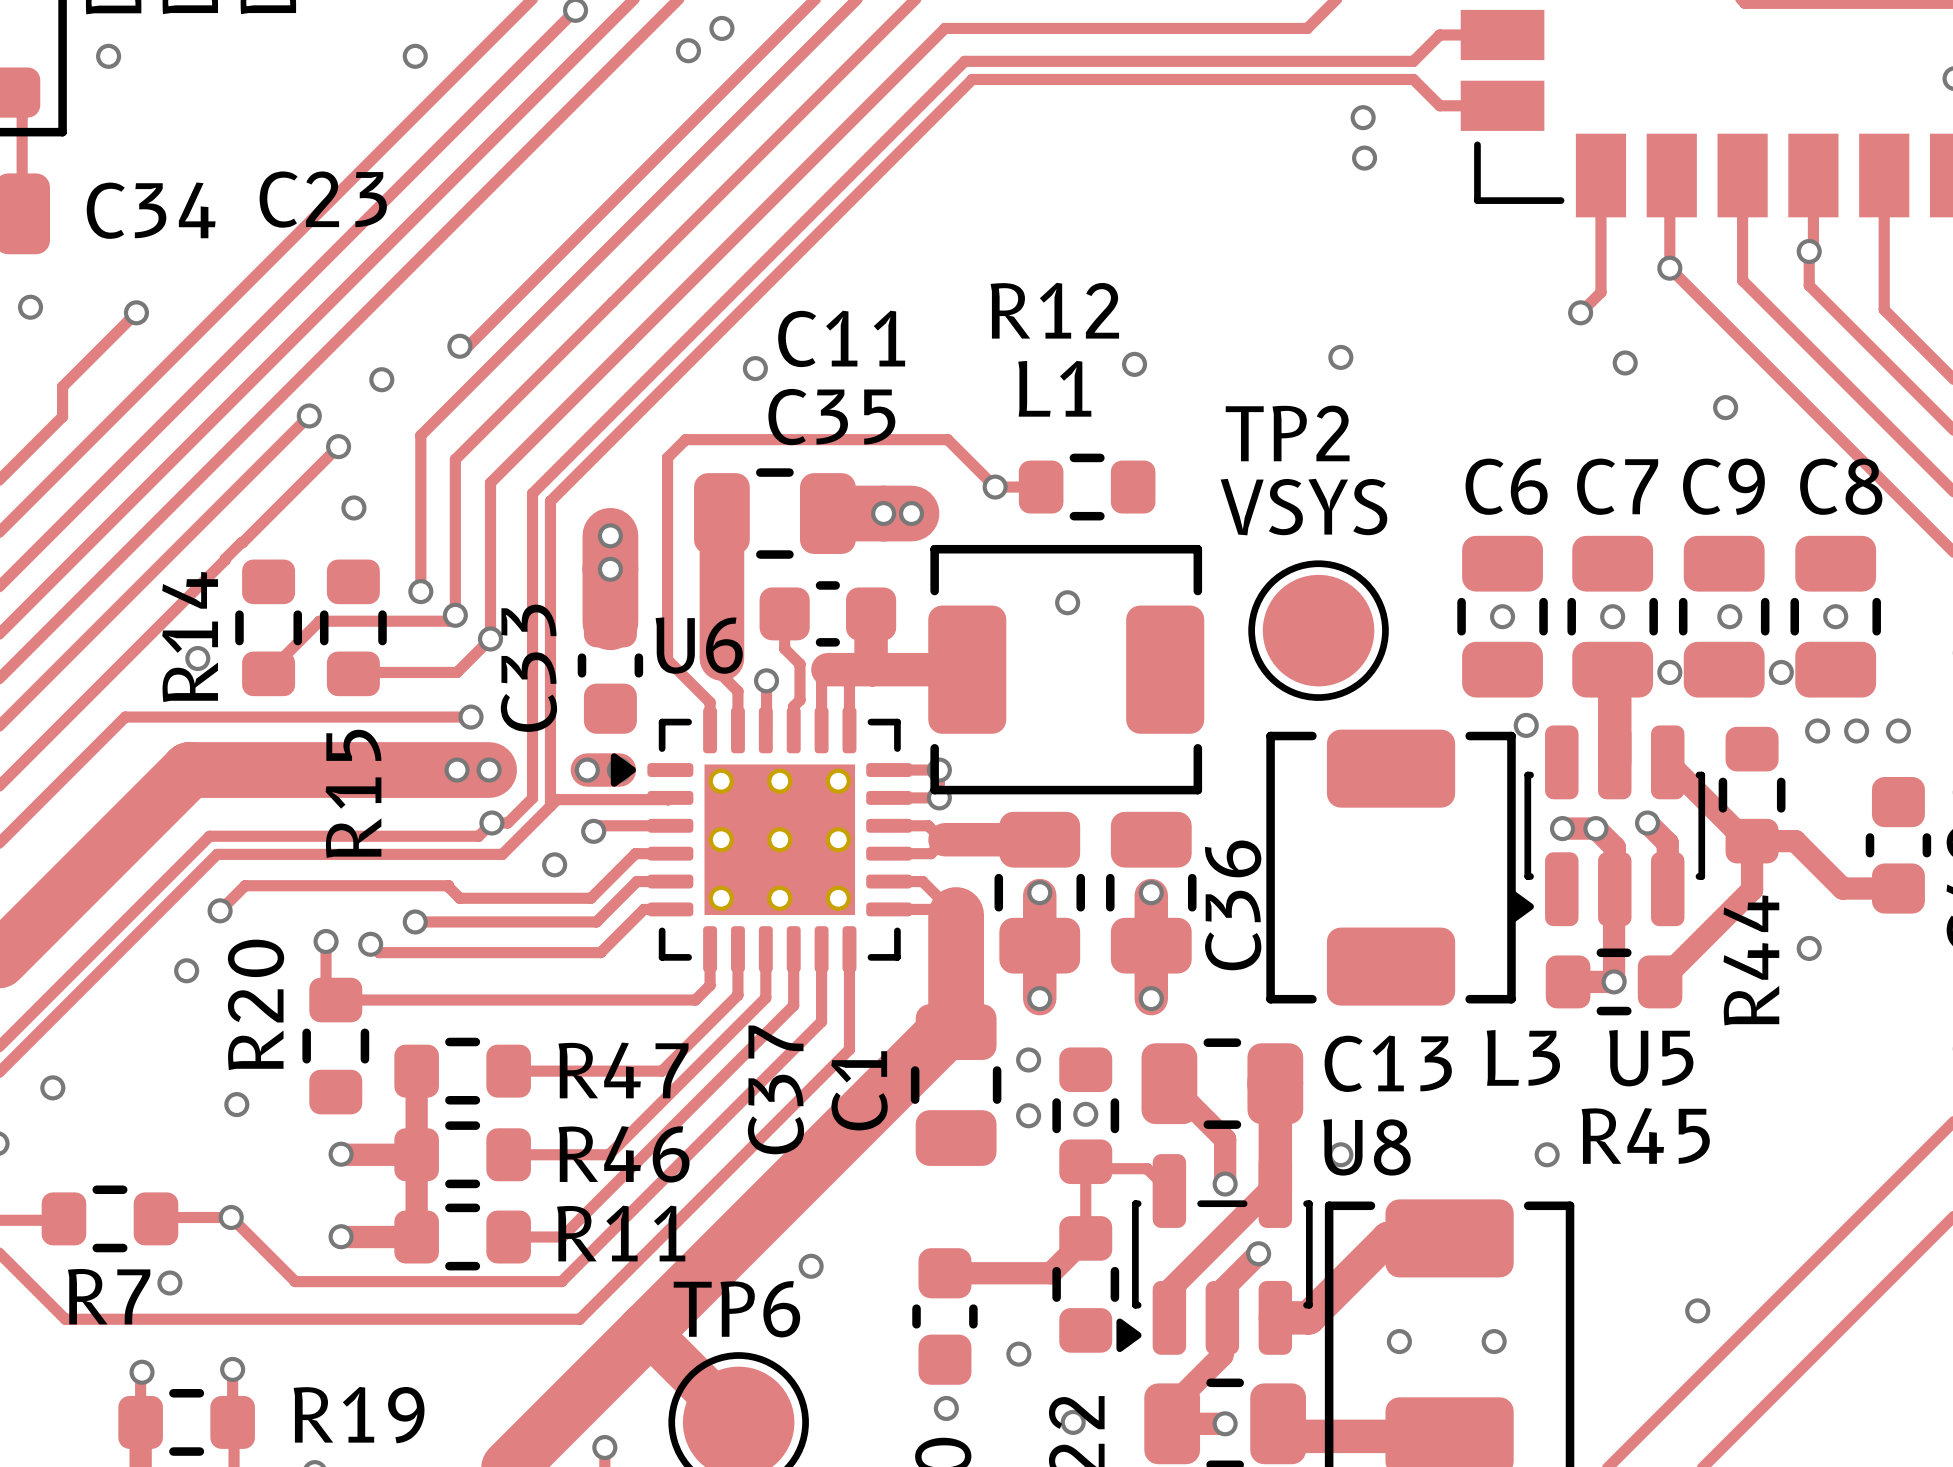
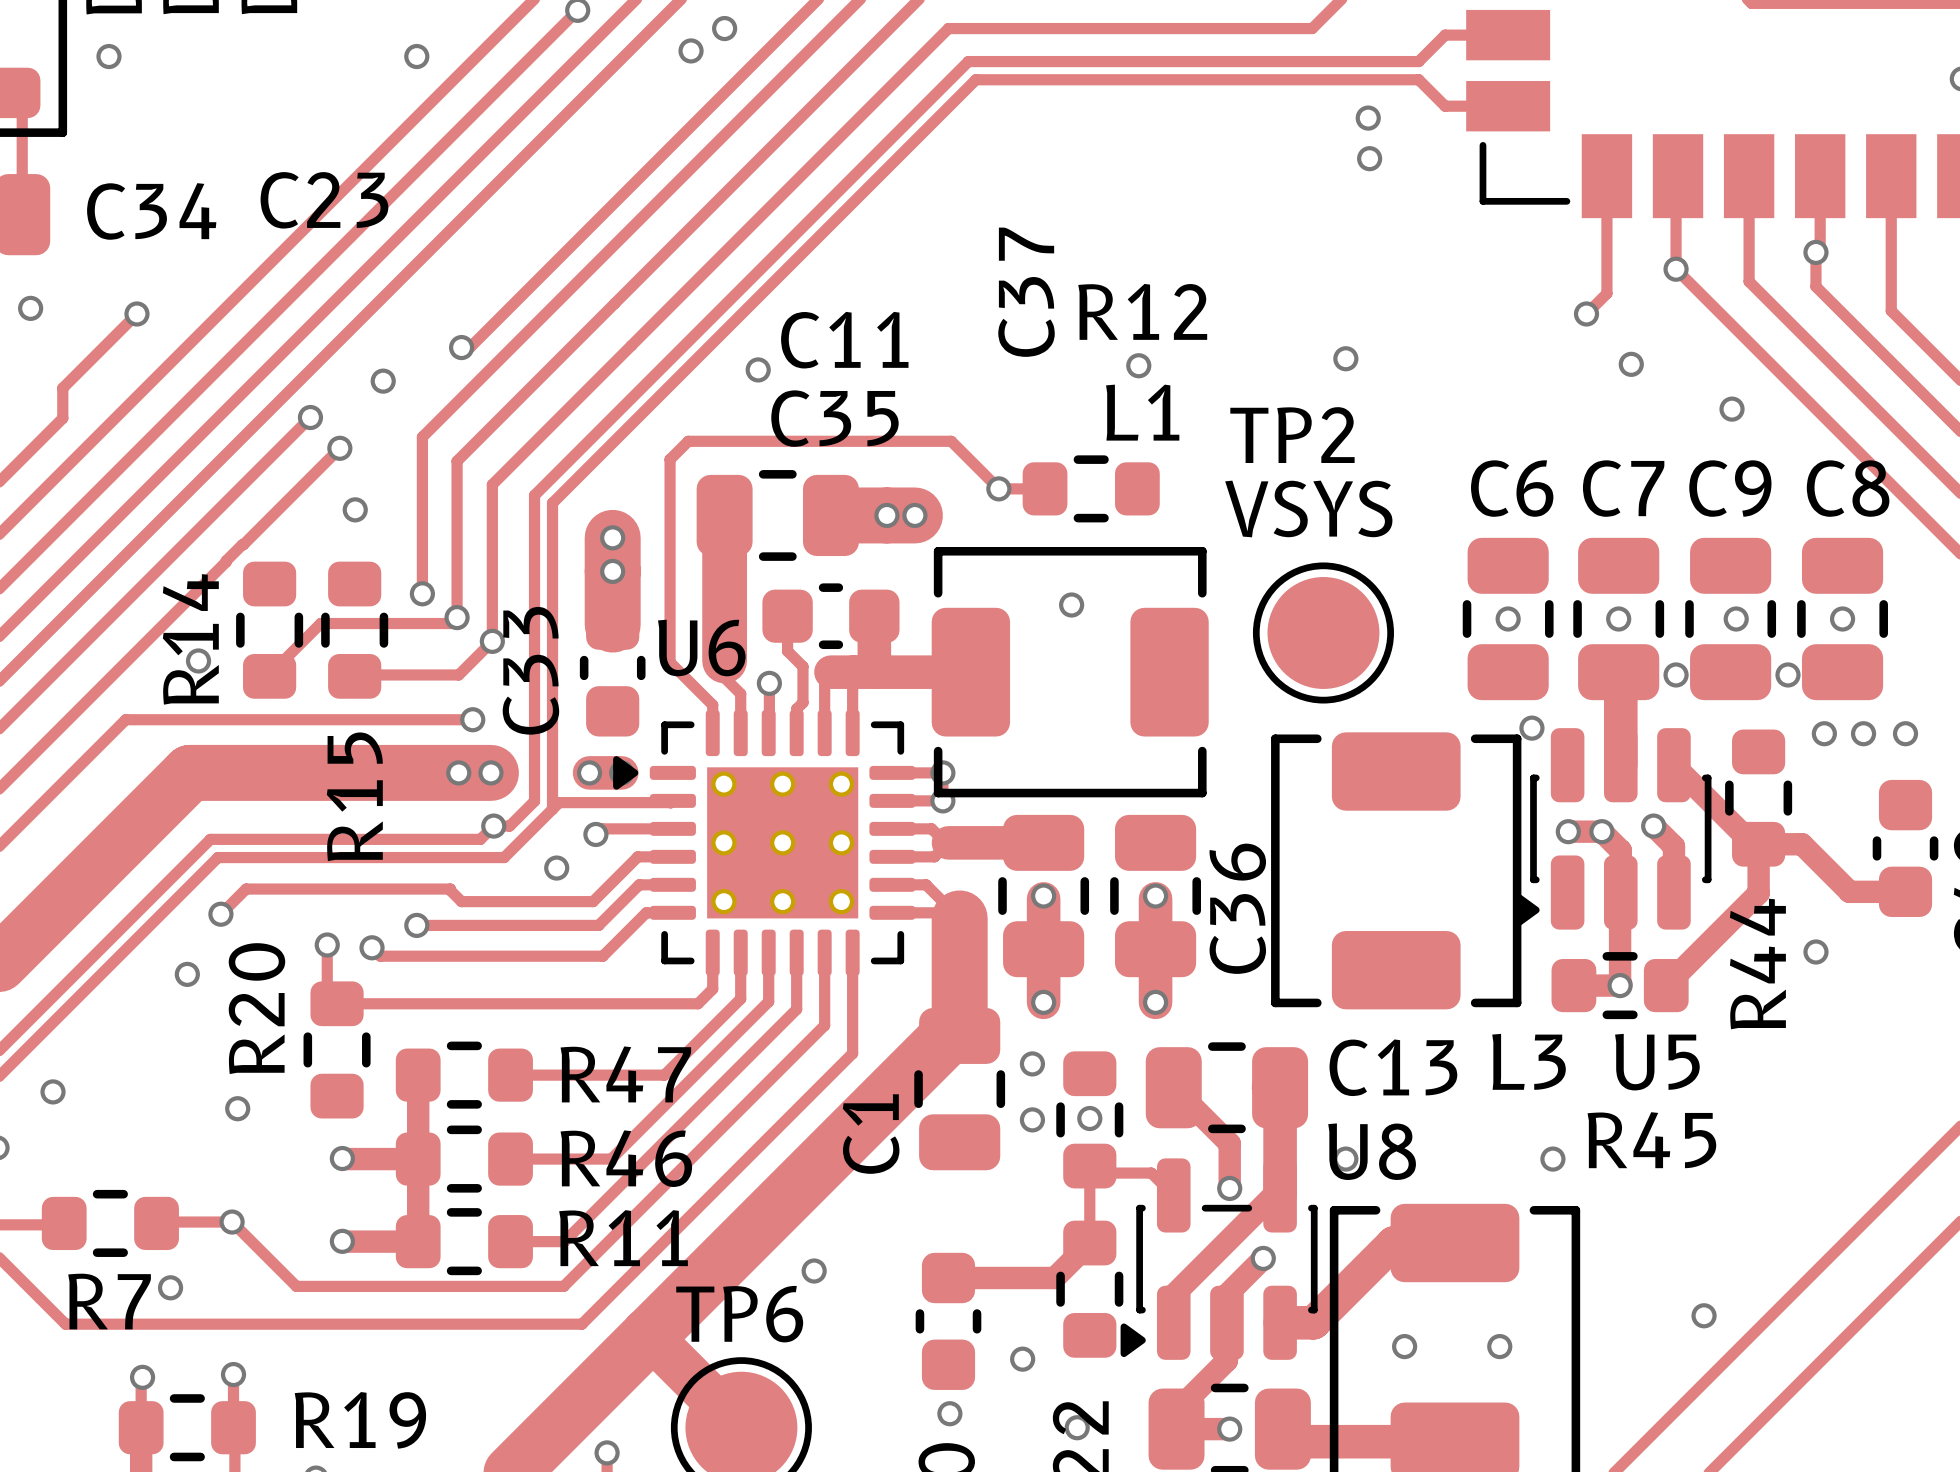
R12 name position: R12 (1054, 310) -> R12 (1142, 311)
L1 name position: L1 (1054, 388) -> L1 (1142, 412)
C37 name position: C37 (775, 1089) -> C37 (1026, 292)
C1 name position: C1 (859, 1090) -> C1 (871, 1134)

